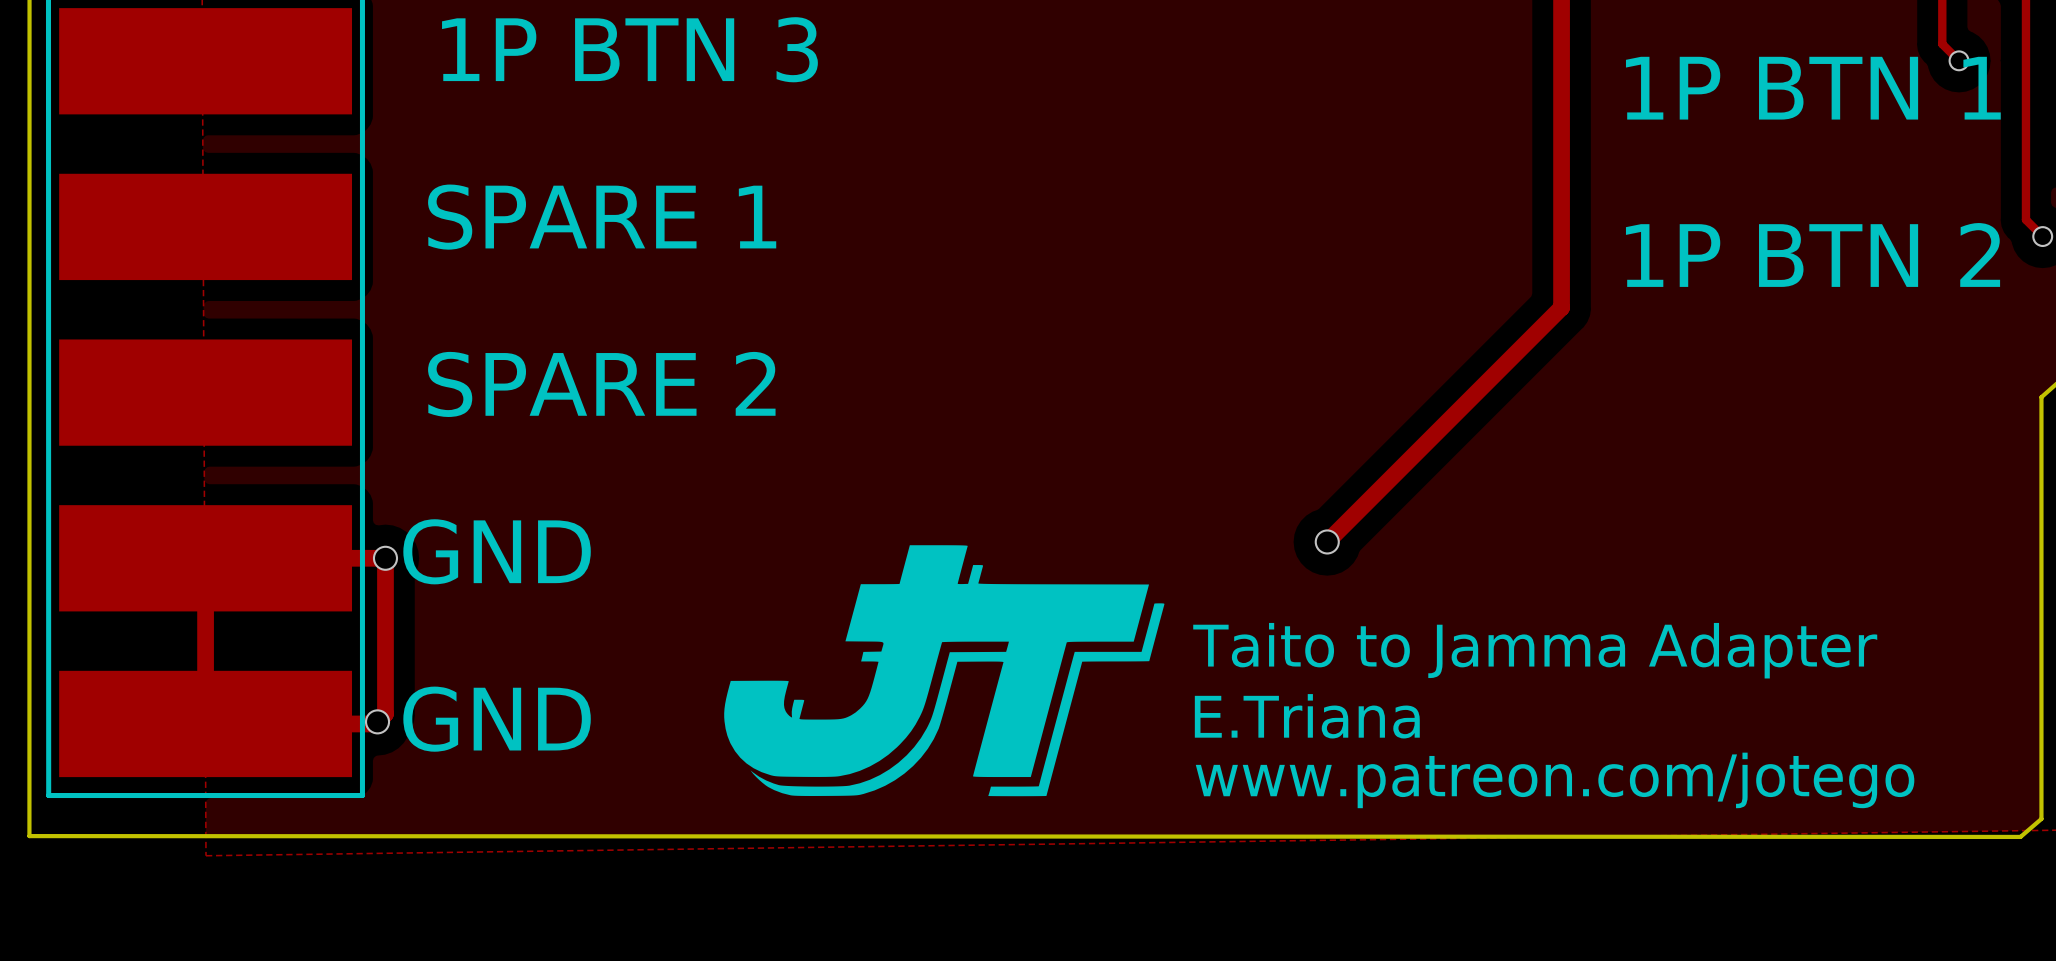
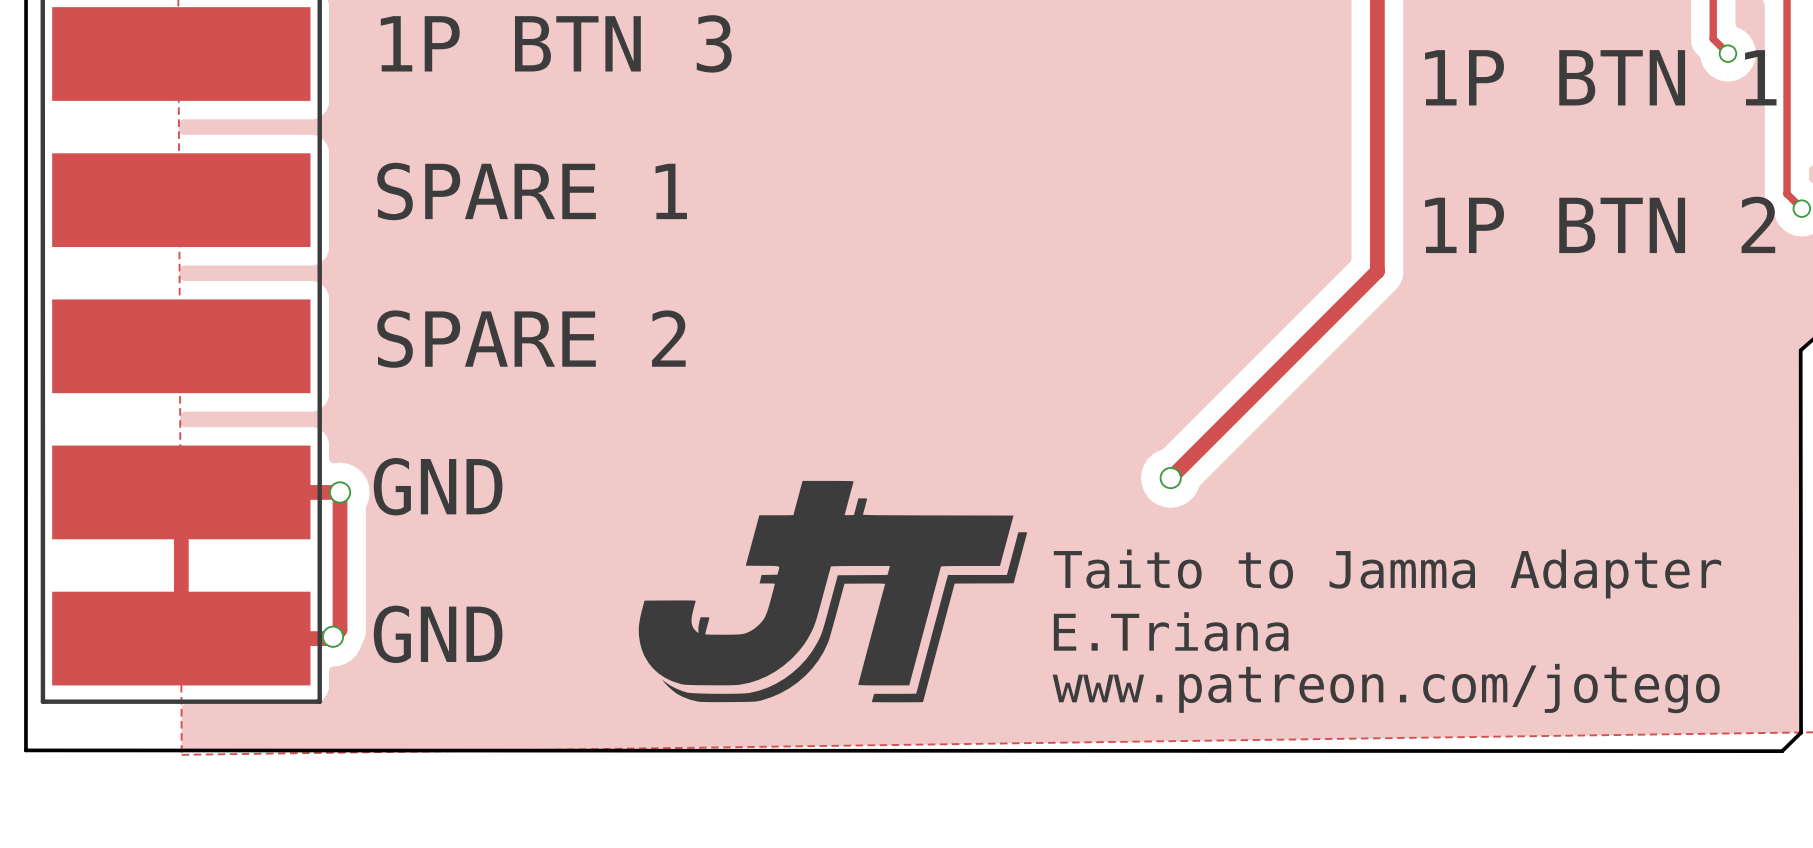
board edge: (2041, 397) (2041, 818) (2020, 836) (29, 836) -> (1800, 350) (1801, 732) (1782, 751) (25, 750) (25, 737)

